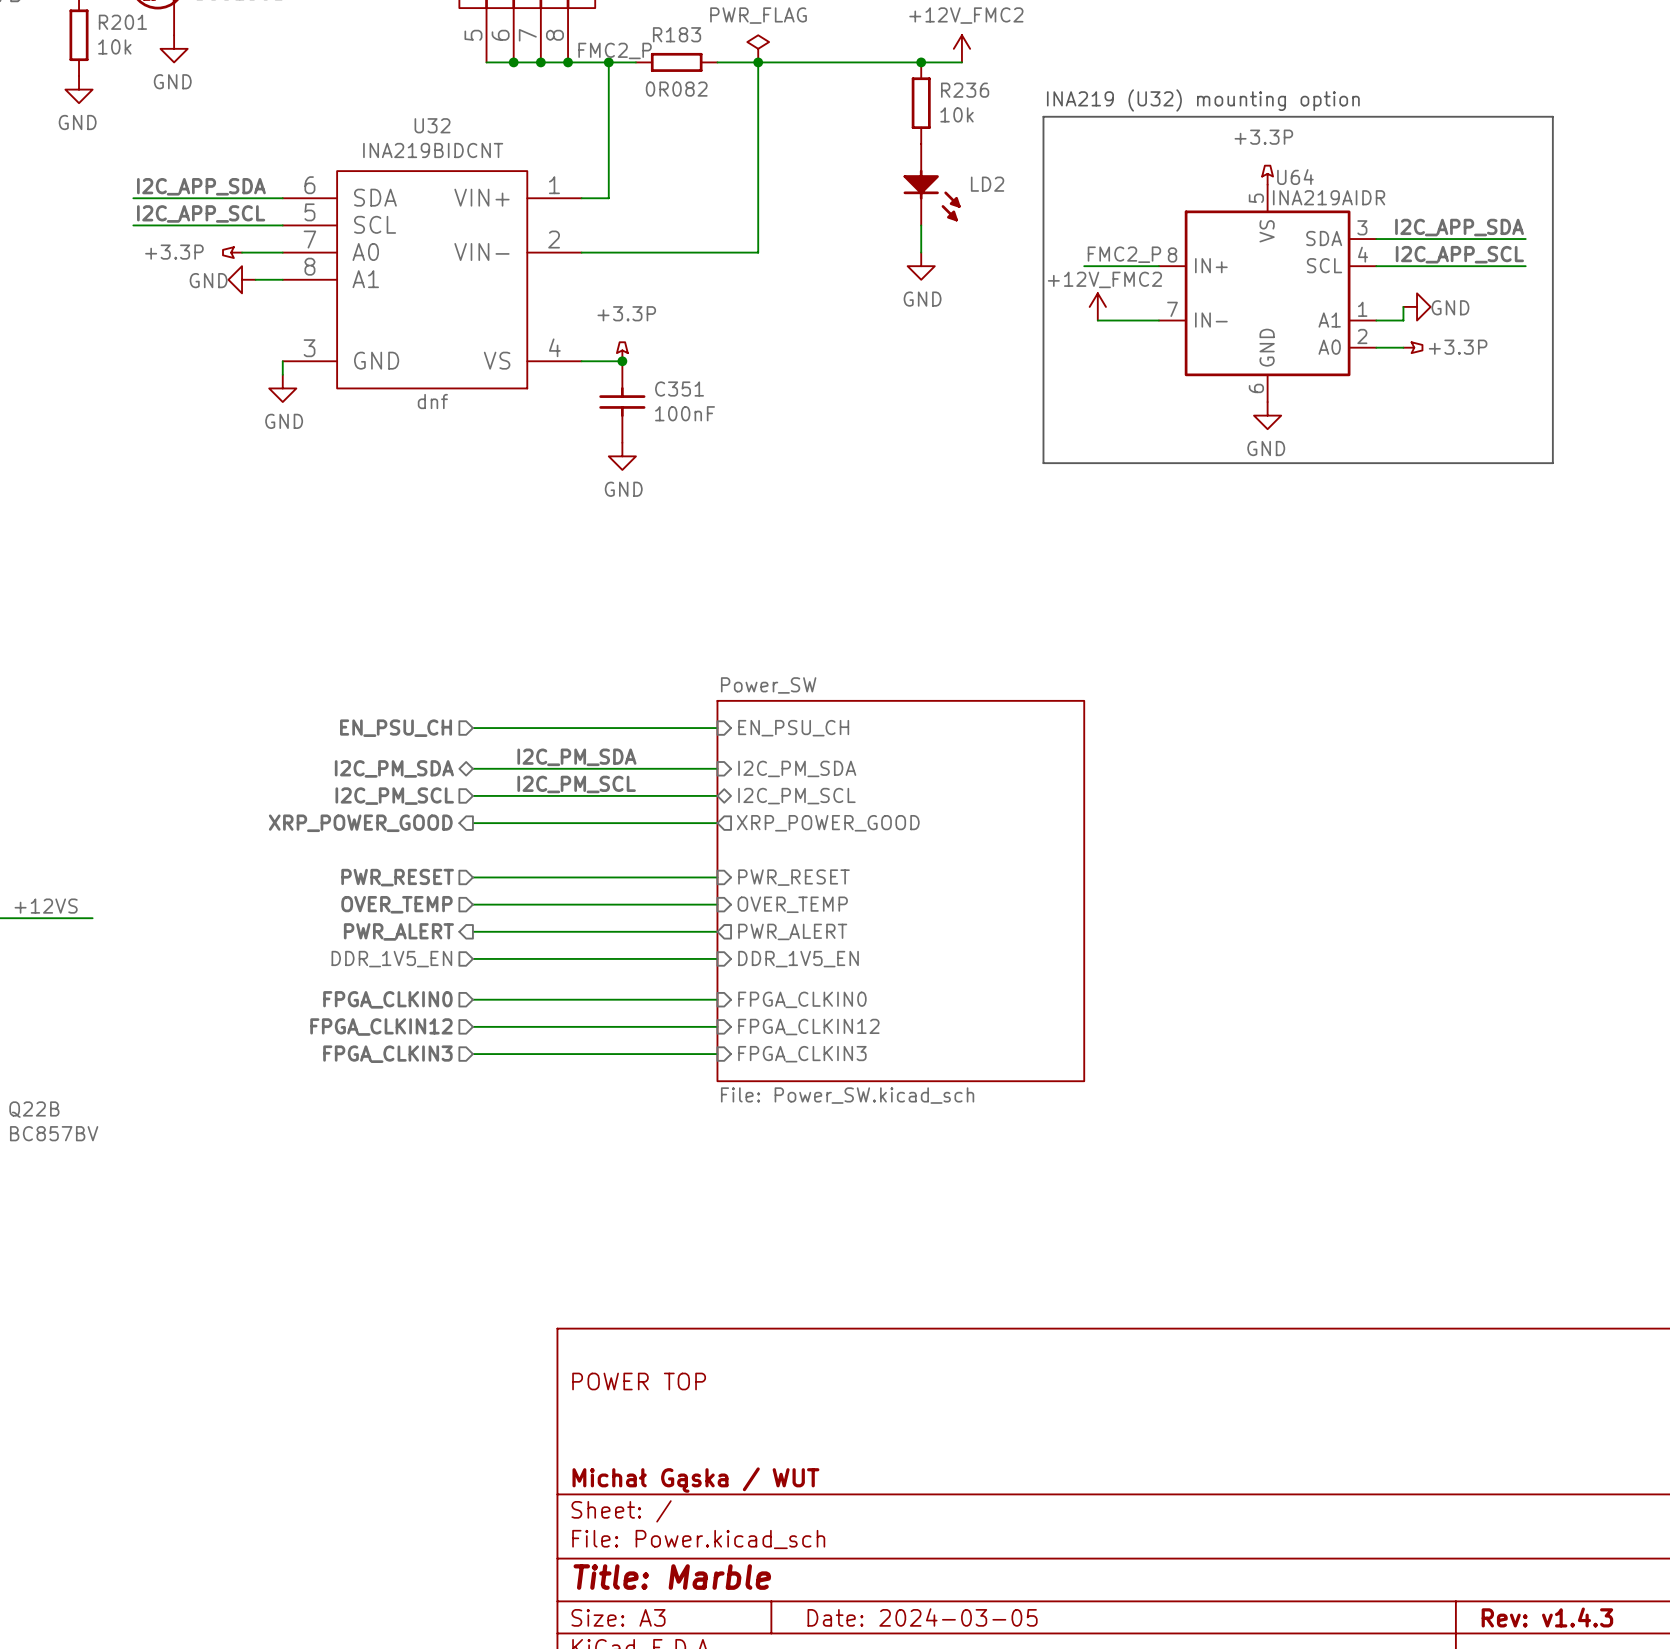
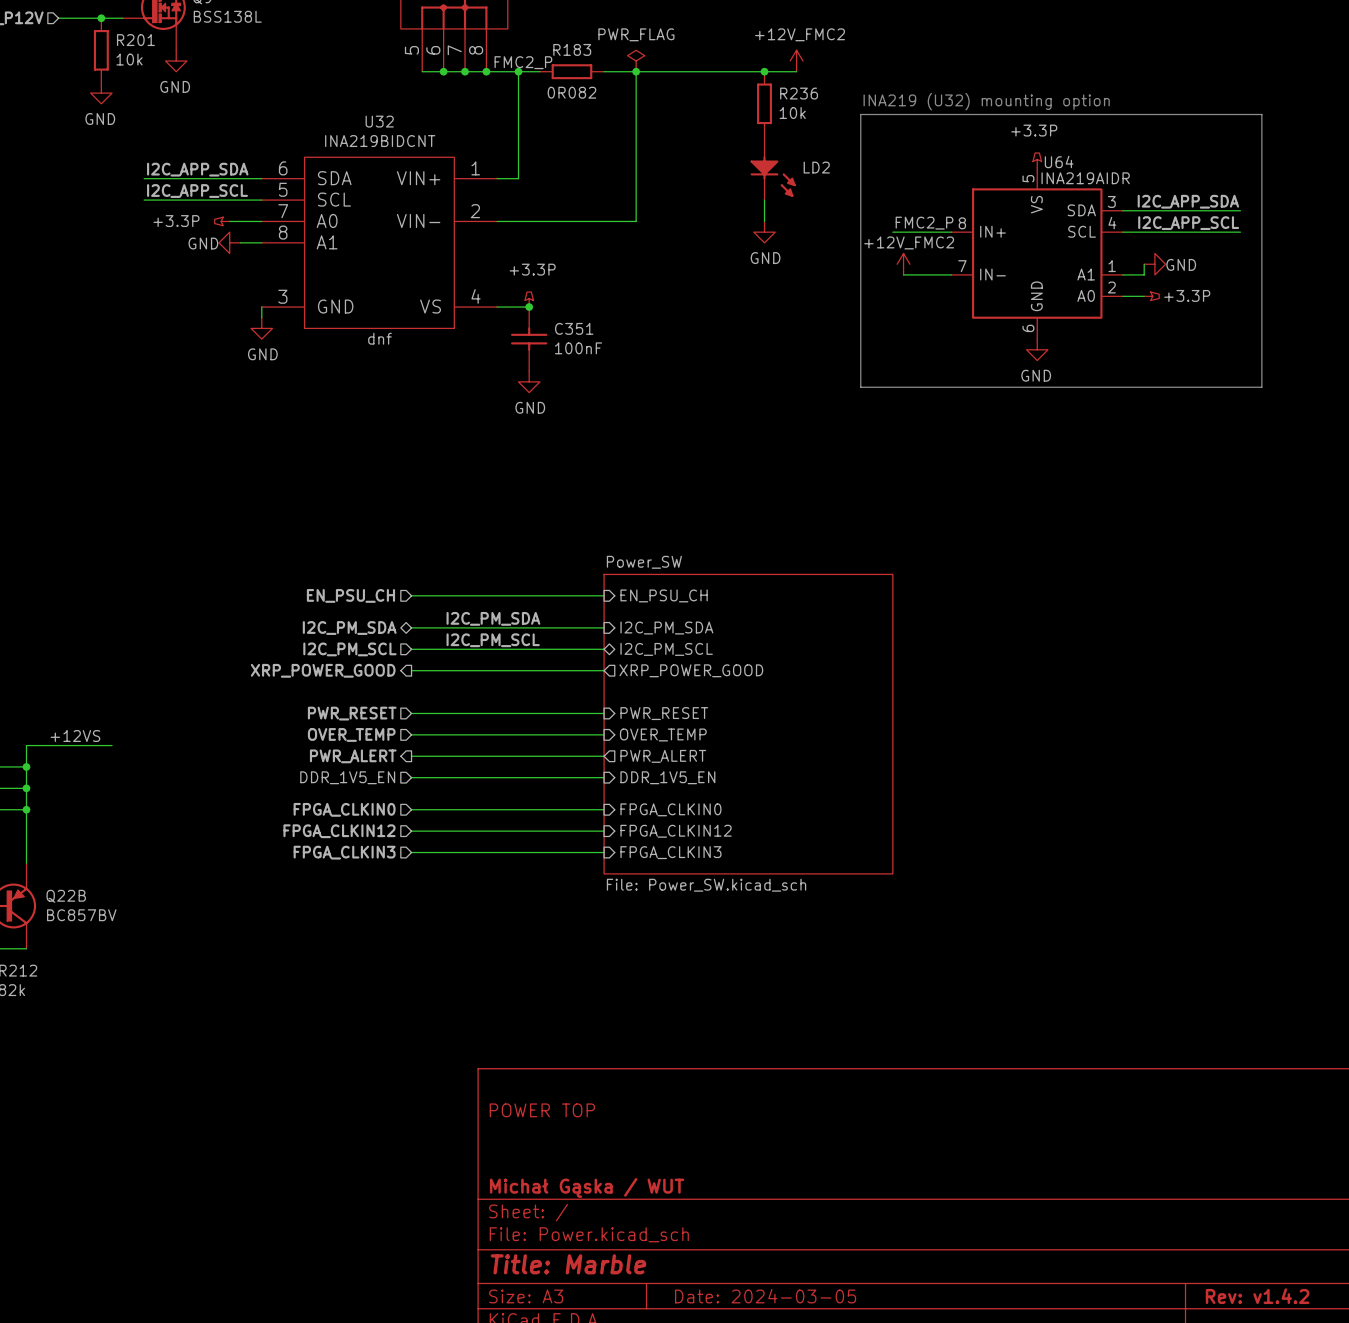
title block: Rev: v1.4.3 (1547, 1617) -> Rev: v1.4.2 (1257, 1296)

